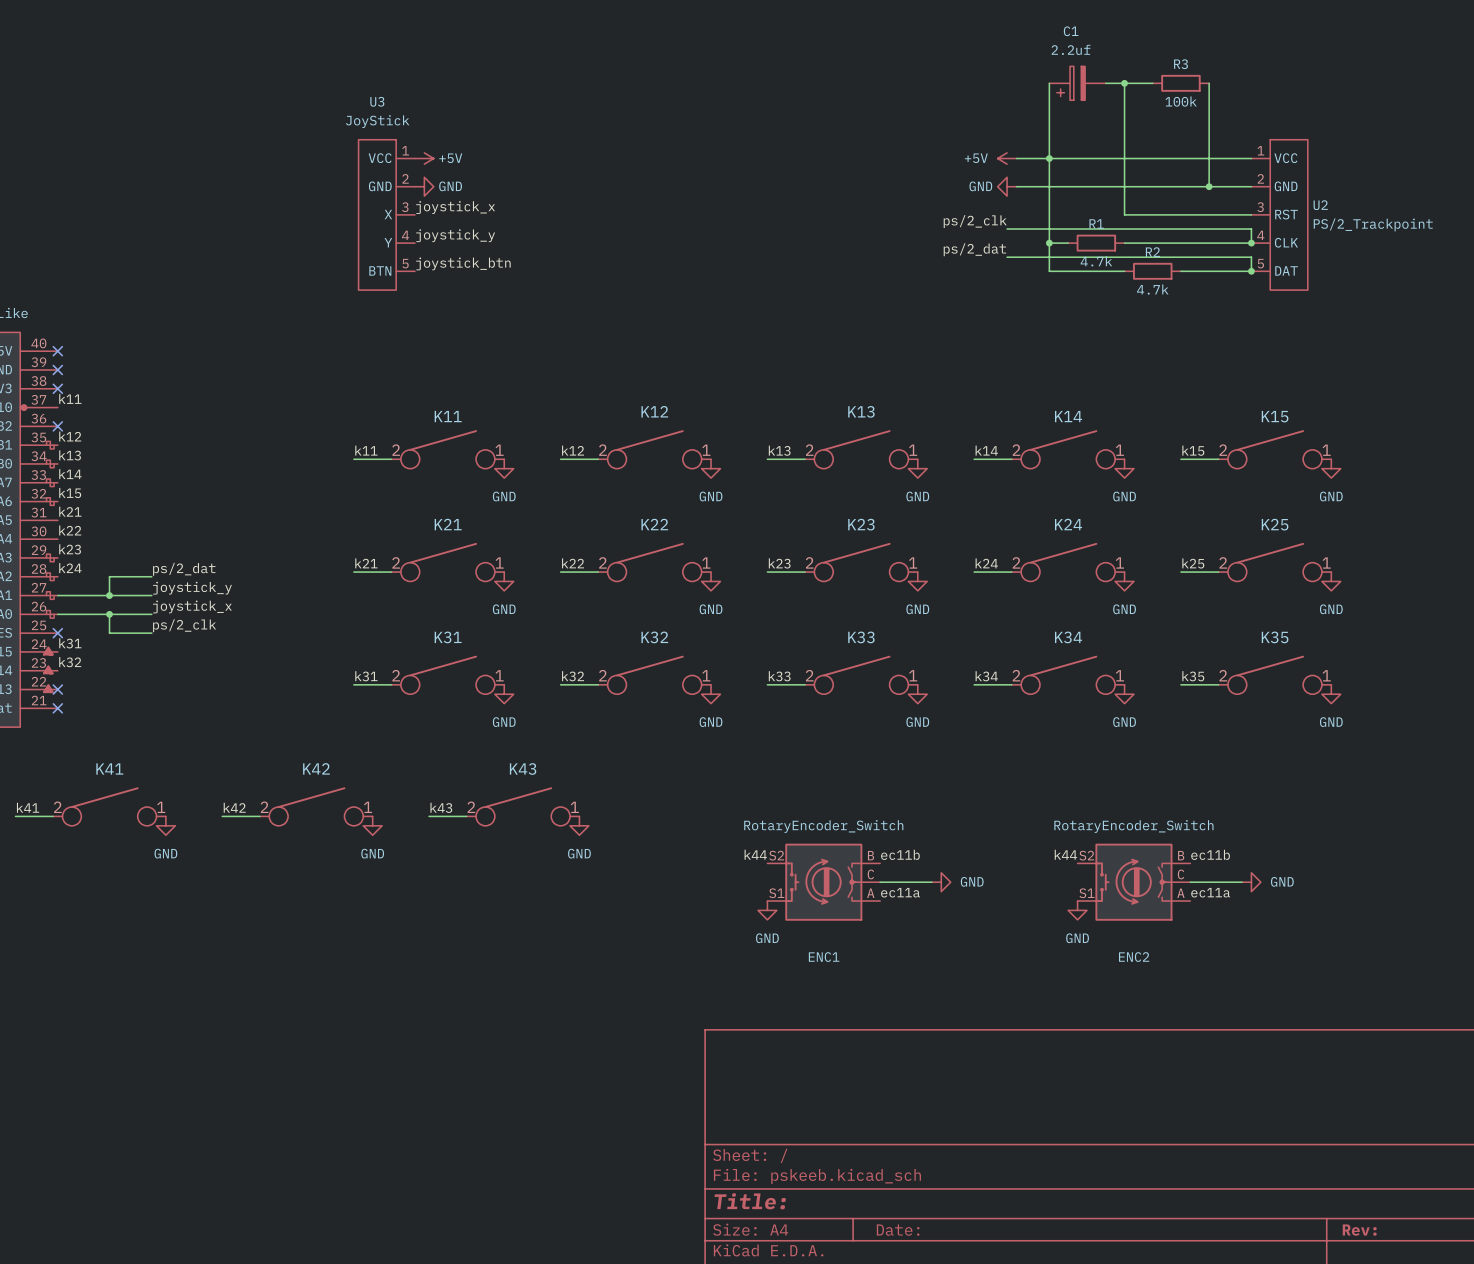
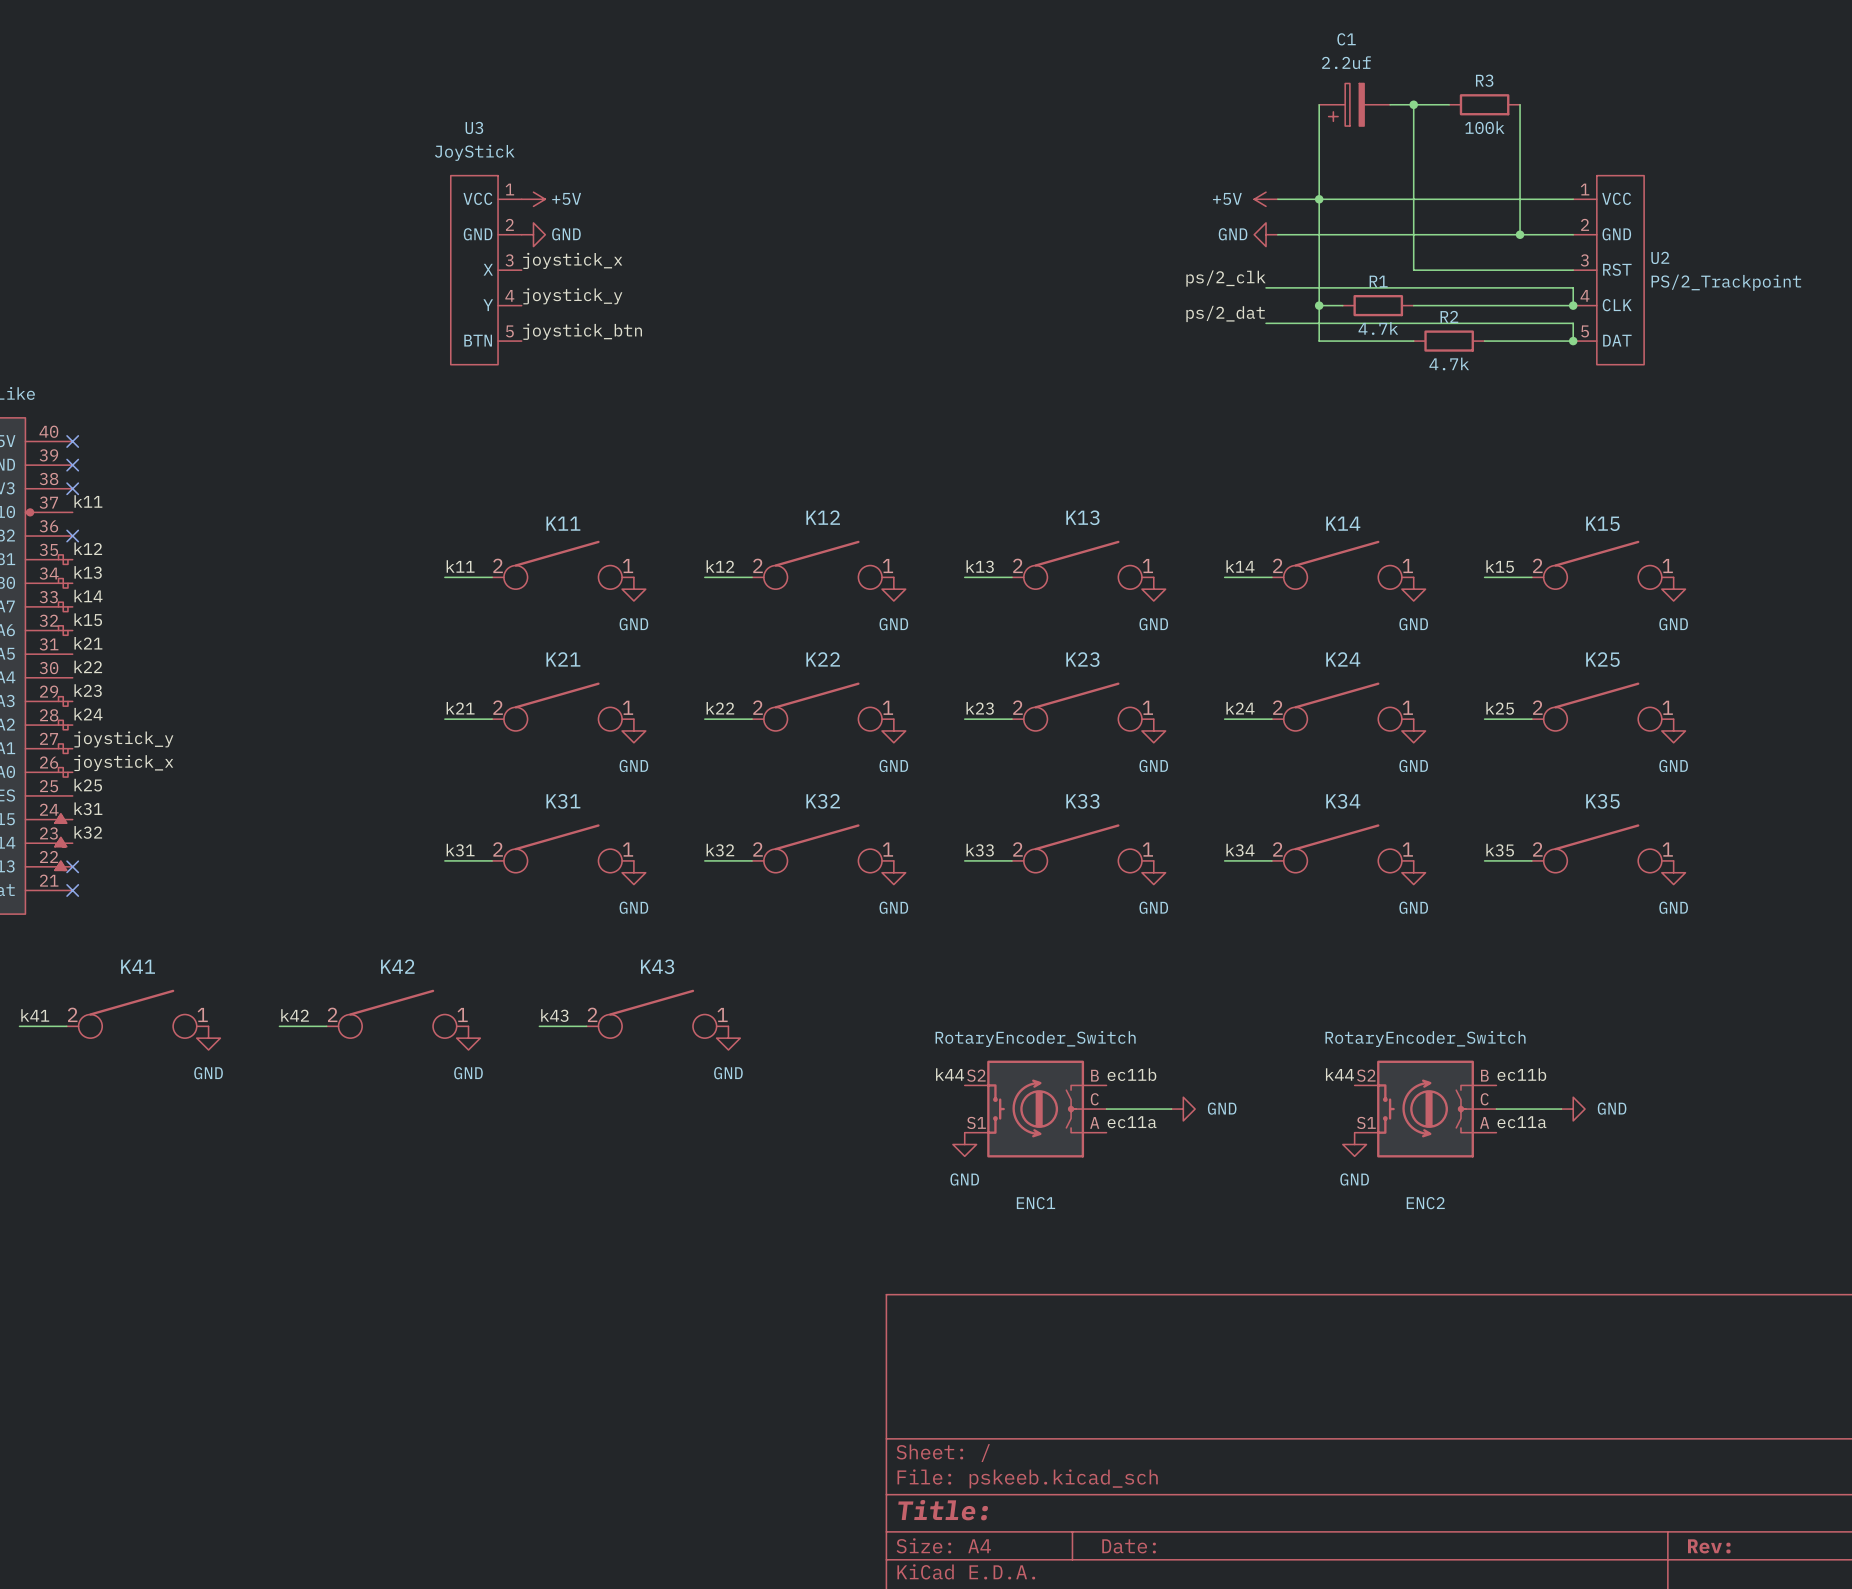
label: ps/2_dat (184, 569) -> none
wire: (151, 576) (109, 576) (109, 595) -> none
label position: joystick_y (192, 588) -> joystick_y (123, 739)
wire: (57, 595) (151, 595) -> none
junction: (109, 595) -> none
label position: joystick_x (192, 606) -> joystick_x (123, 763)
wire: (57, 614) (151, 614) -> none
wire: (109, 614) (109, 633) (151, 633) -> none
junction: (109, 614) -> none
label: none -> k25 (88, 785)
label: ps/2_clk (184, 625) -> none
no-connect mark: (57, 633) -> none

